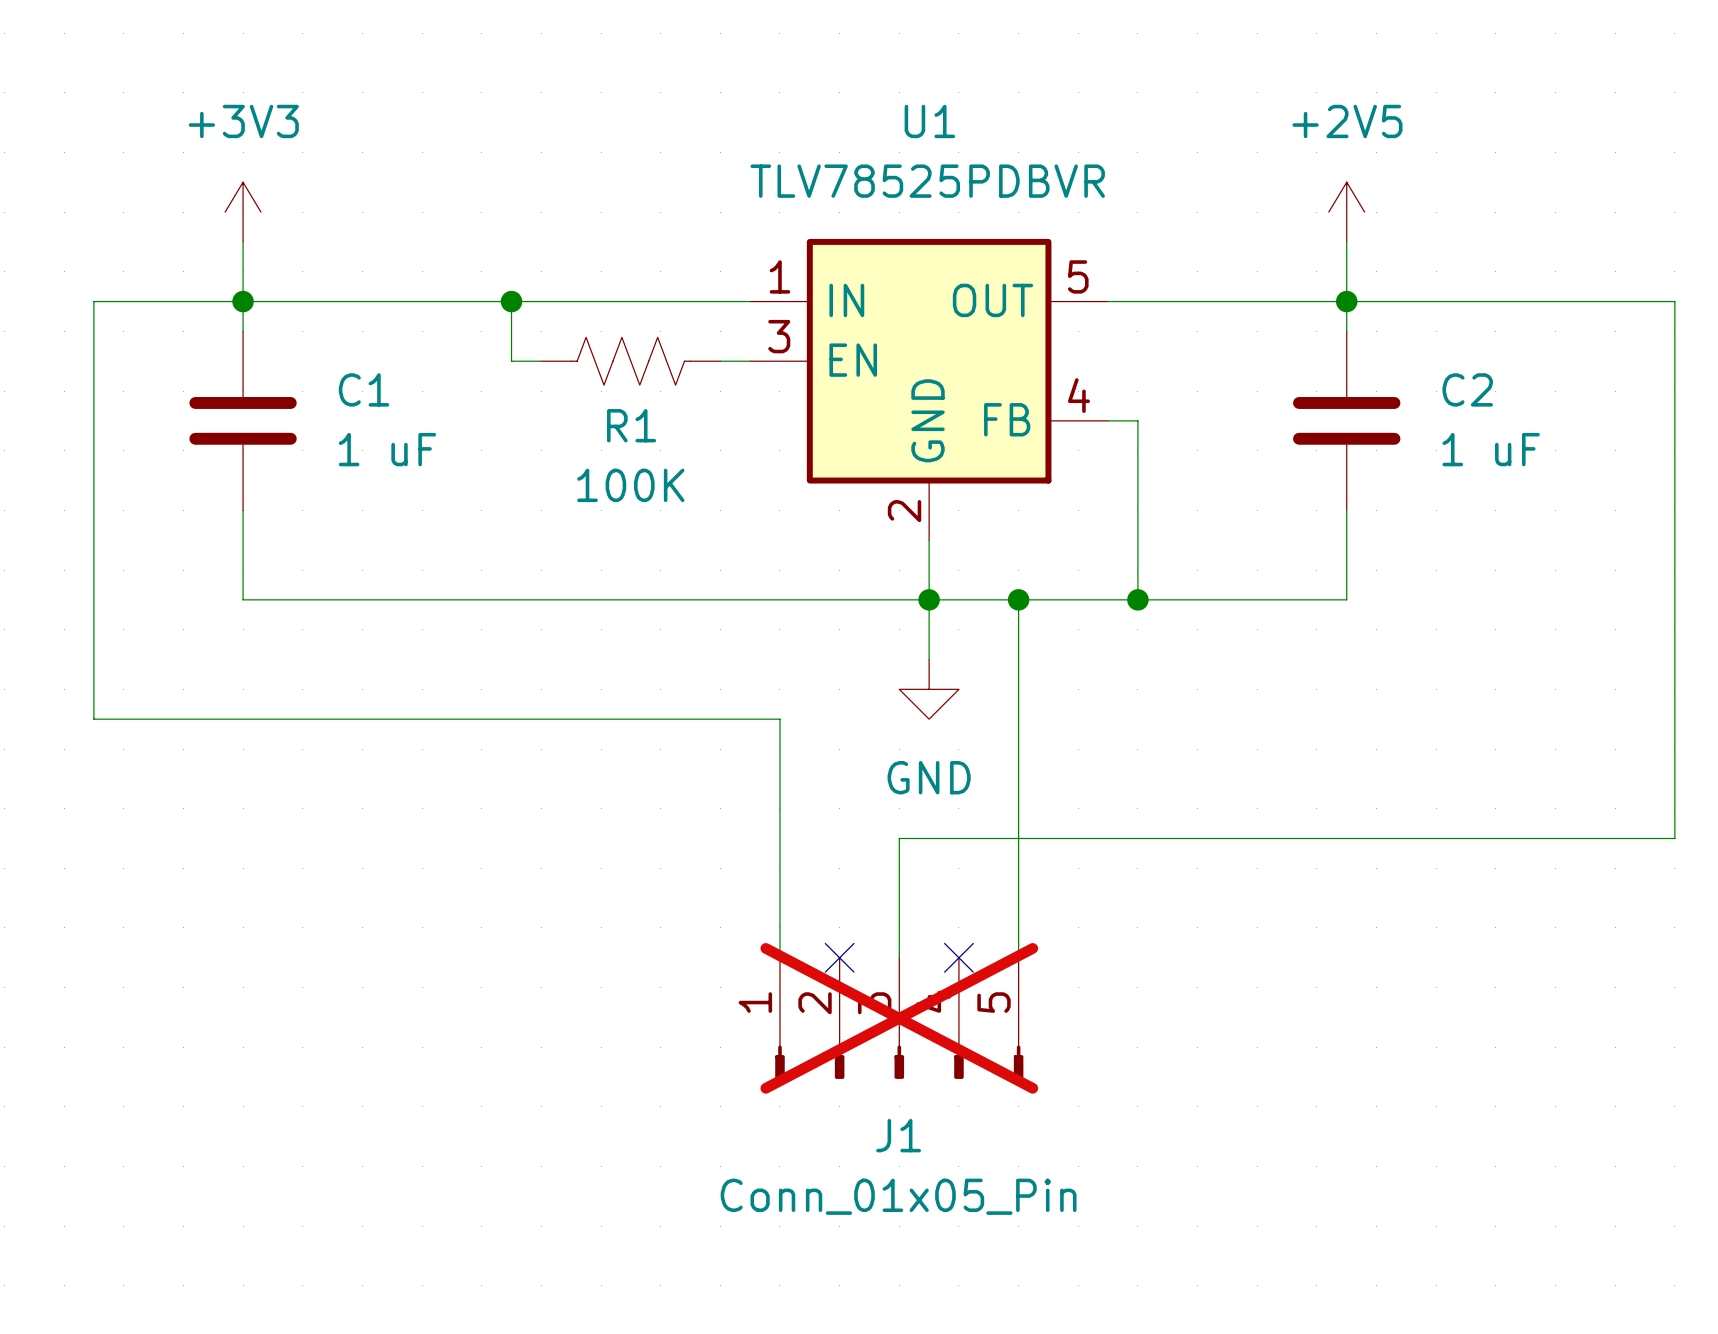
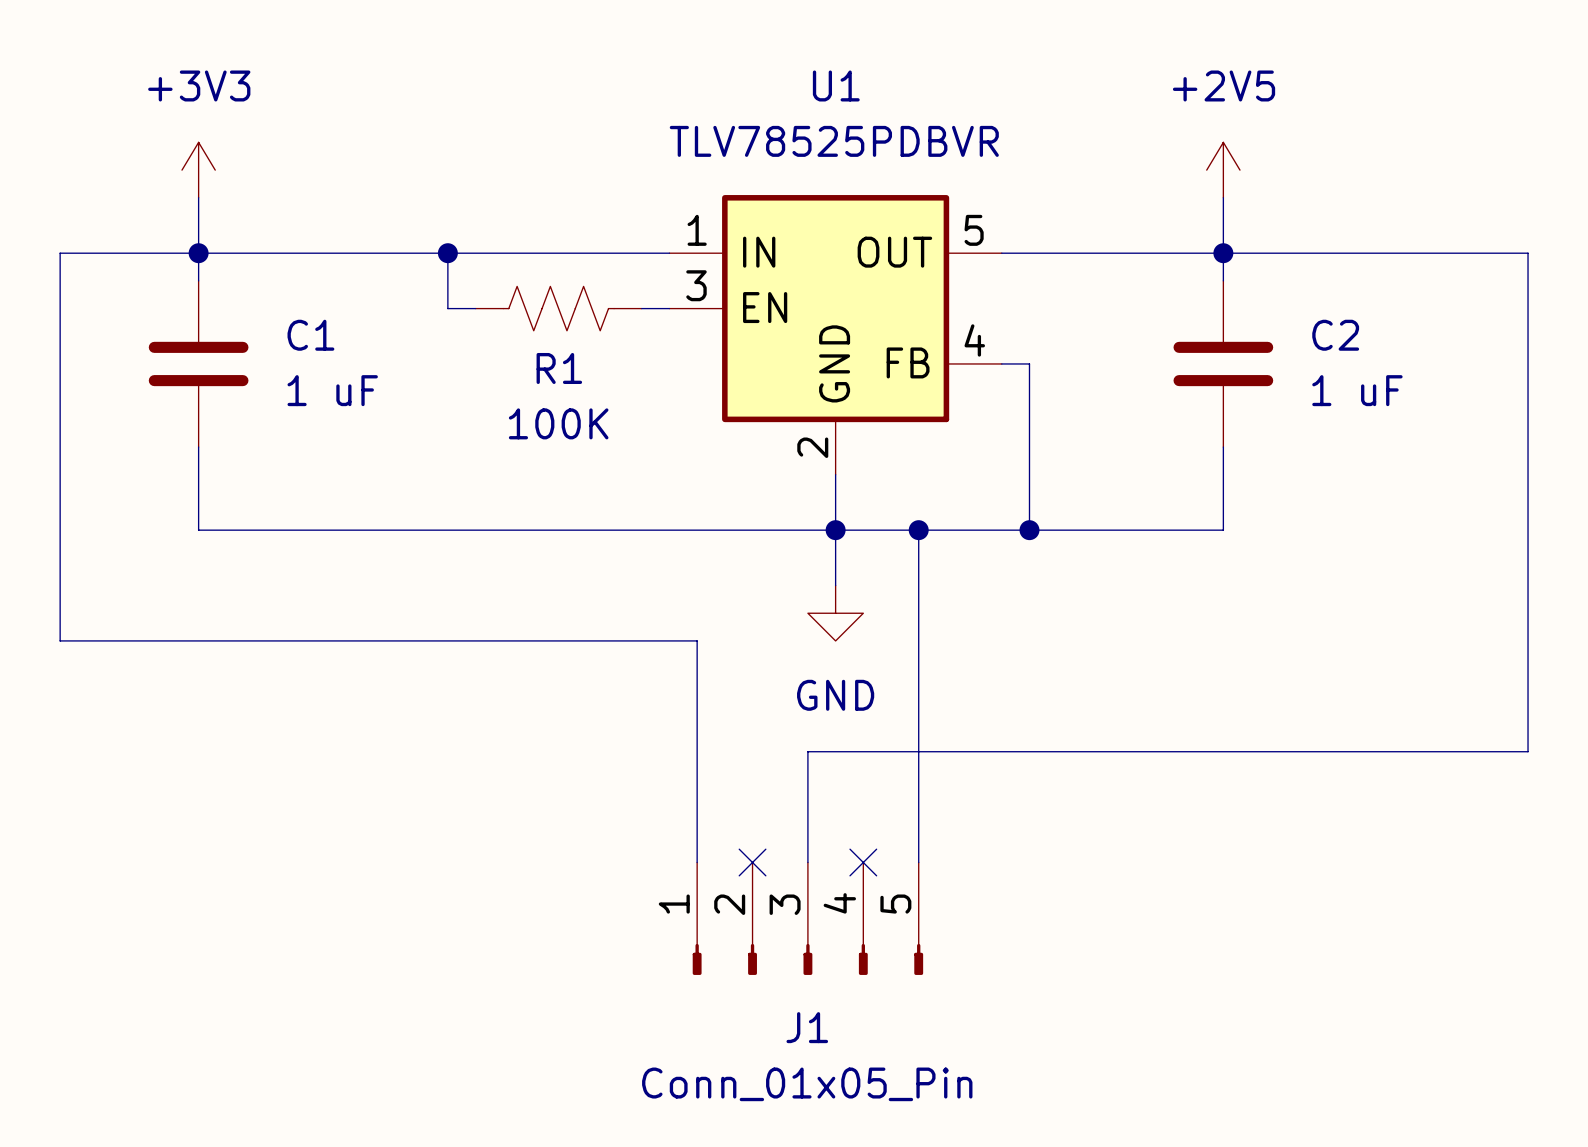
J1 do-not-place cross: (899, 1018) -> none

